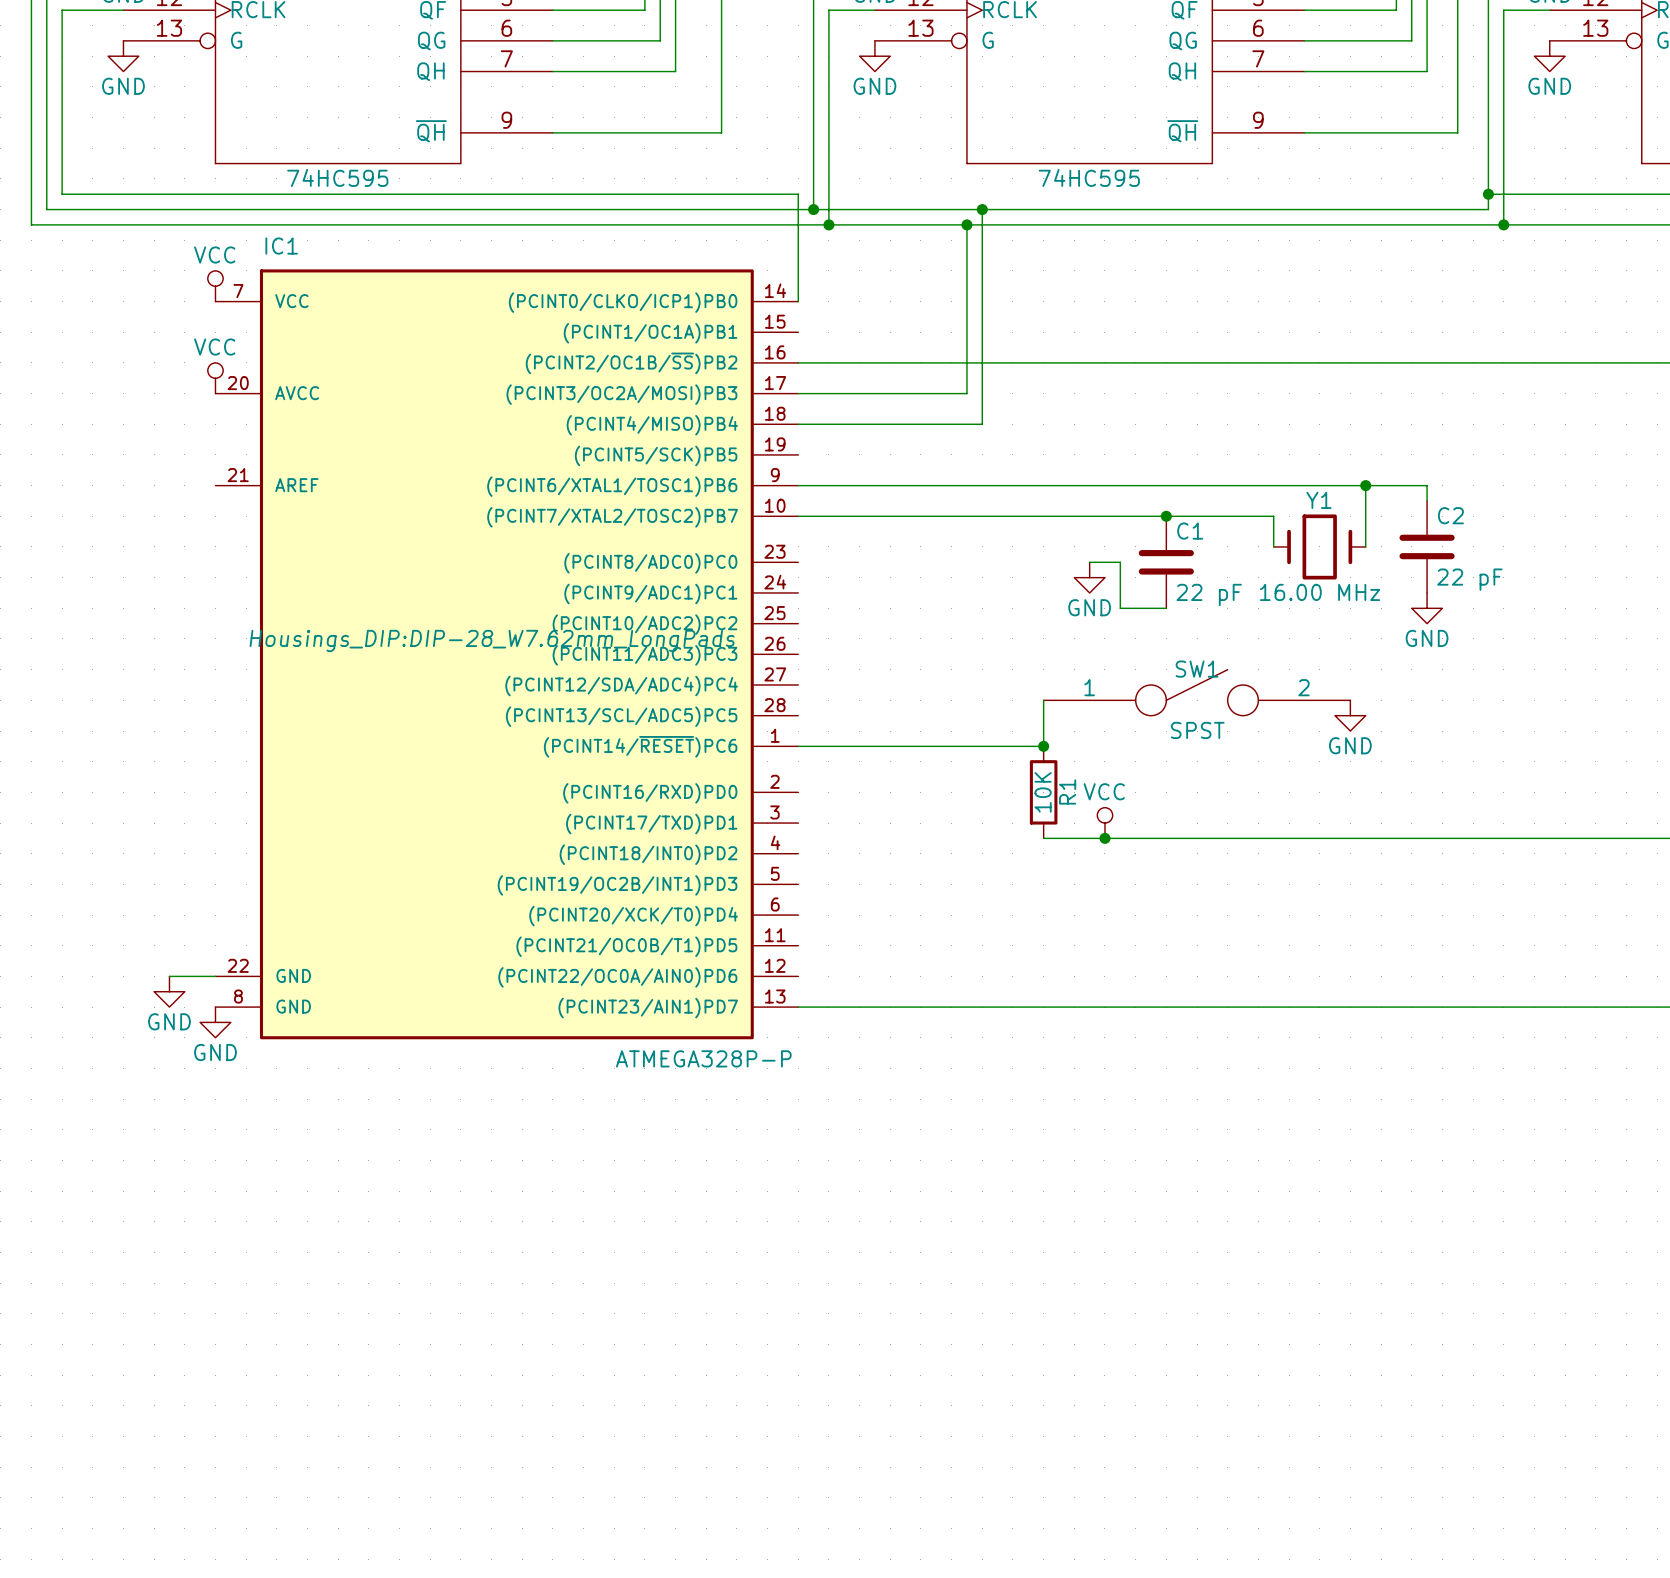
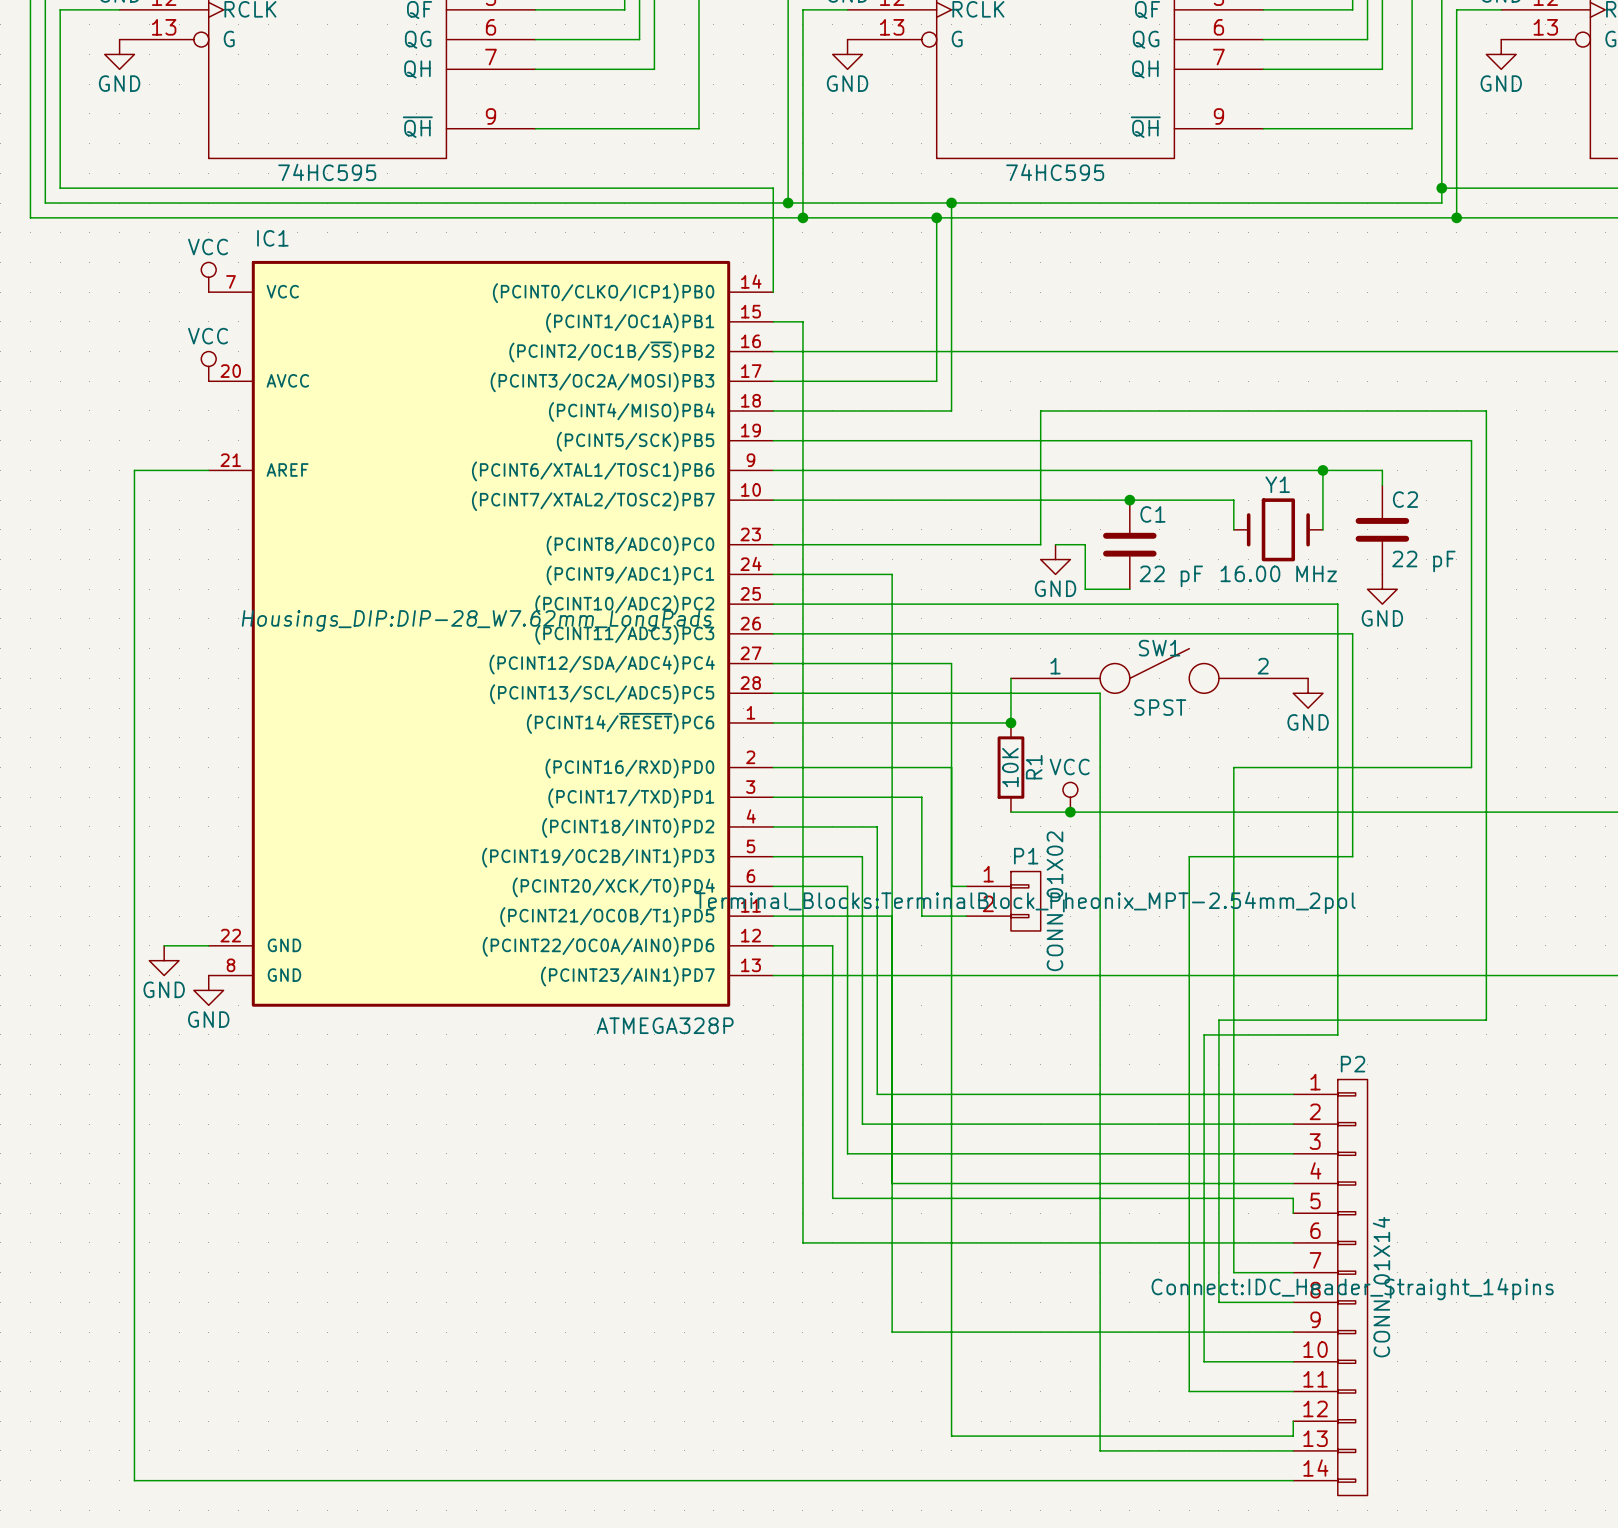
wire: none -> (773, 321) (802, 321) (802, 1242) (1293, 1242)
wire: none -> (773, 440) (1471, 440) (1471, 767) (1233, 767) (1233, 1272) (1293, 1272)
wire: none -> (208, 470) (134, 470) (134, 1480) (1293, 1480)
wire: none -> (773, 544) (1040, 544) (1040, 410) (1486, 410) (1486, 1020) (1218, 1020) (1218, 1302) (1293, 1302)
wire: none -> (773, 574) (892, 574) (892, 1332) (1293, 1332)
wire: none -> (773, 604) (1337, 604) (1337, 1034) (1204, 1034) (1204, 1361) (1293, 1361)
wire: none -> (773, 633) (1352, 633) (1352, 856) (1189, 856) (1189, 1391) (1293, 1391)
wire: none -> (773, 663) (951, 663) (951, 1436) (1293, 1436) (1293, 1421)
wire: none -> (773, 693) (1100, 693) (1100, 1450) (1293, 1450)
wire: none -> (773, 767) (951, 767)
wire: none -> (773, 797) (921, 797) (921, 916) (966, 916)
wire: none -> (773, 826) (877, 826) (877, 1094) (1293, 1094)
wire: none -> (773, 856) (862, 856) (862, 1124) (1293, 1124)
wire: none -> (773, 886) (847, 886) (847, 1153) (1293, 1153)
wire: none -> (951, 886) (966, 886)
P1: none -> CONN_01X02 (1003, 901)
wire: none -> (773, 916) (892, 916)
wire: none -> (773, 945) (832, 945) (832, 1198) (1293, 1198) (1293, 1213)
IC1 value: ATMEGA328P-P (703, 1058) -> ATMEGA328P (665, 1025)
wire: none -> (892, 1183) (1293, 1183)
P2: none -> CONN_01X14 (1330, 1287)

